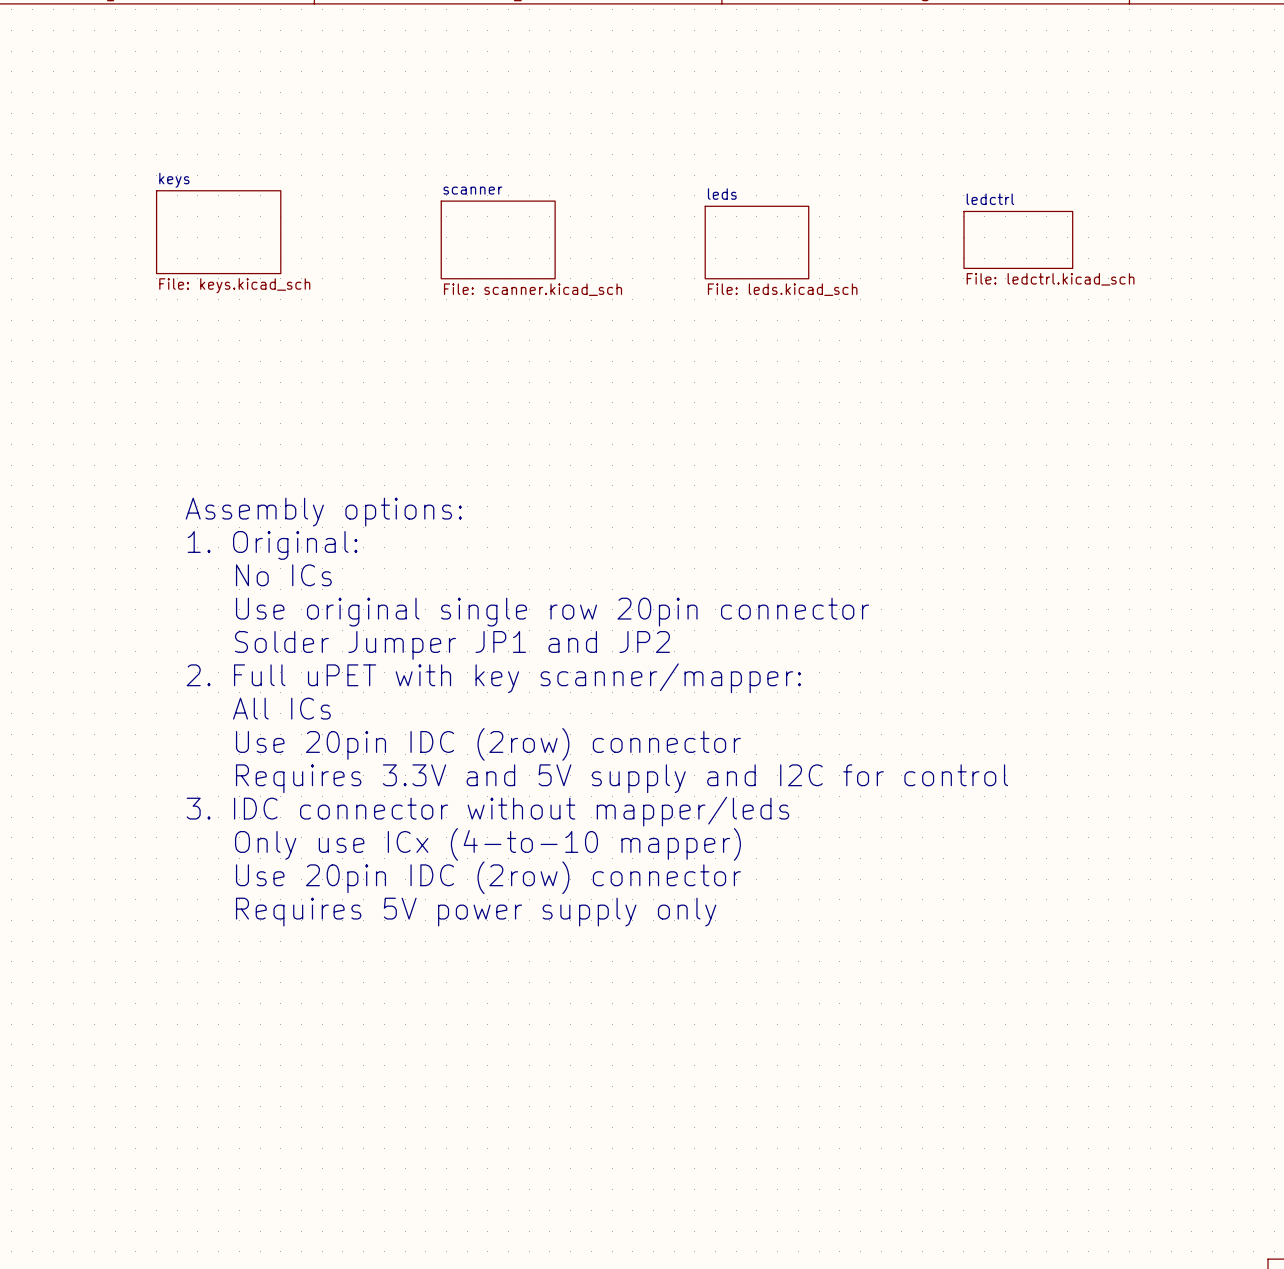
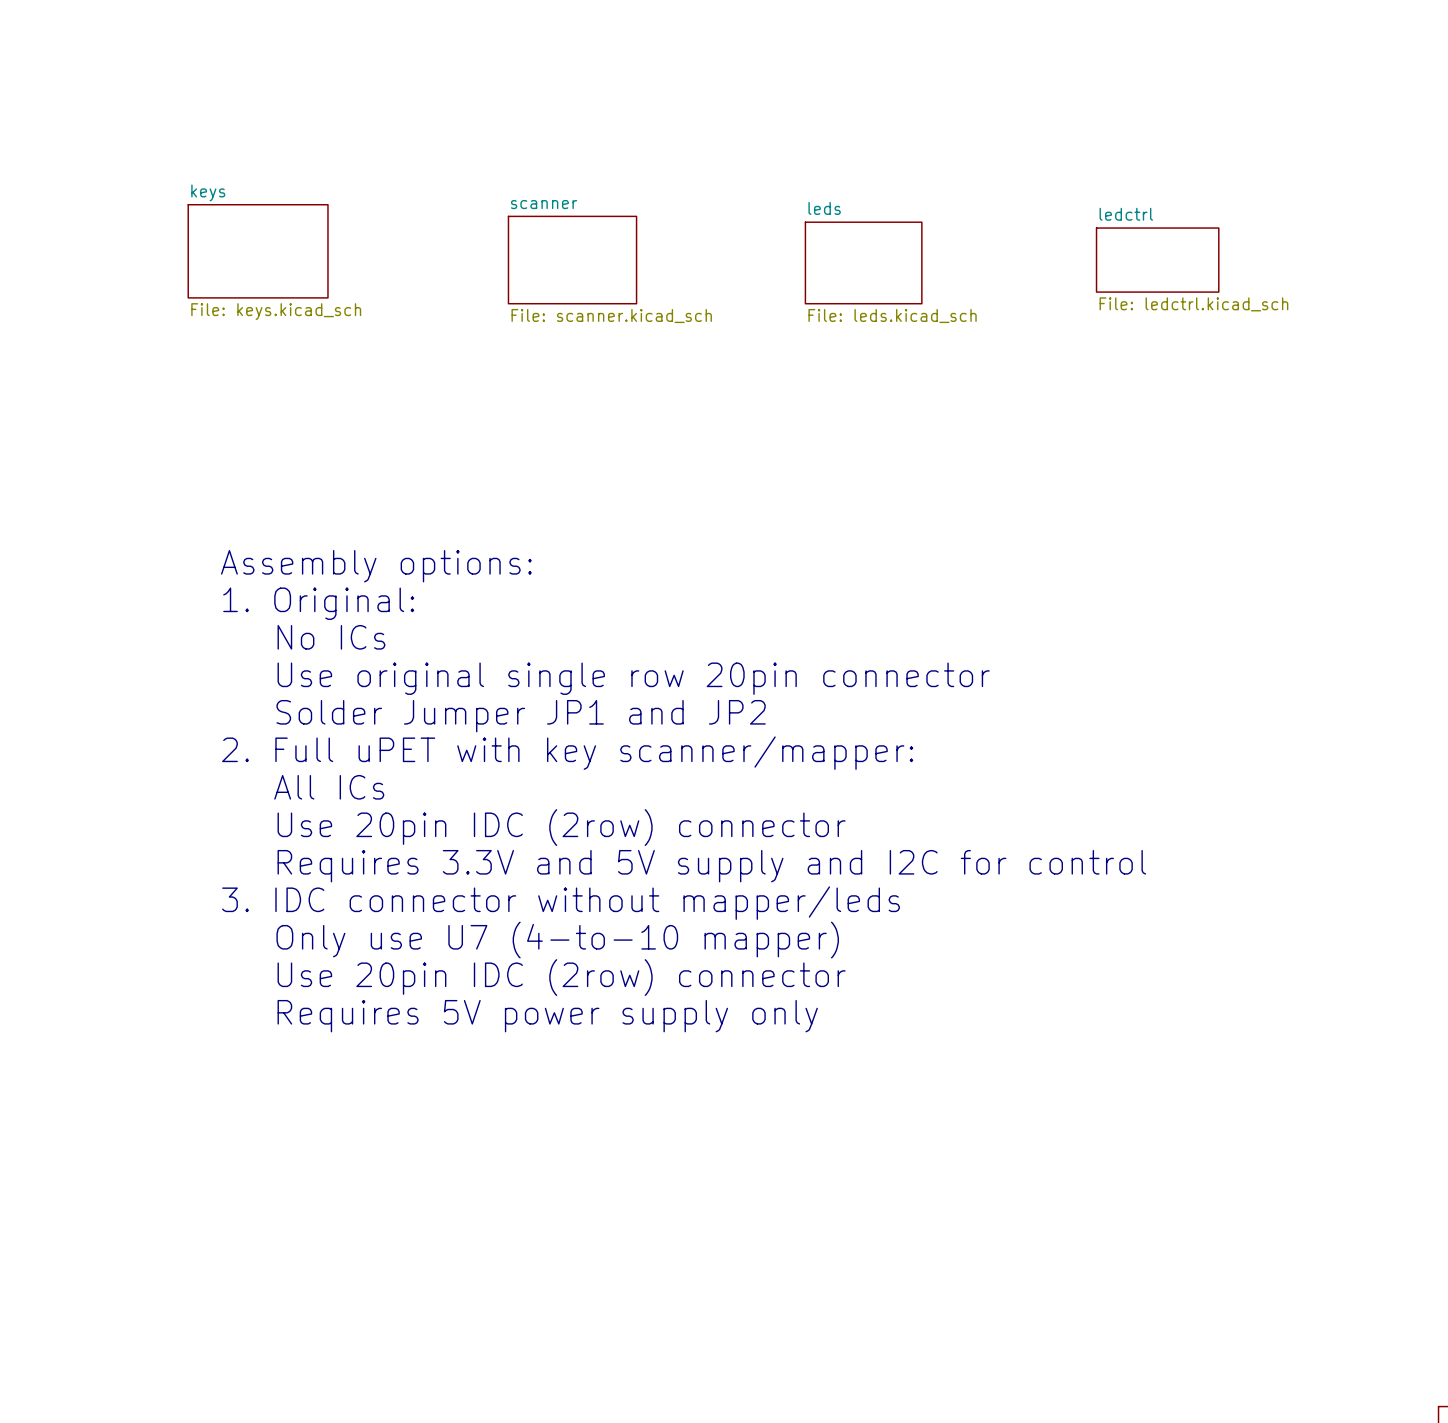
text: Only use ICx (4-to-10 mapper) (487, 844) -> Only use U7 (4-to-10 mapper) (557, 940)

